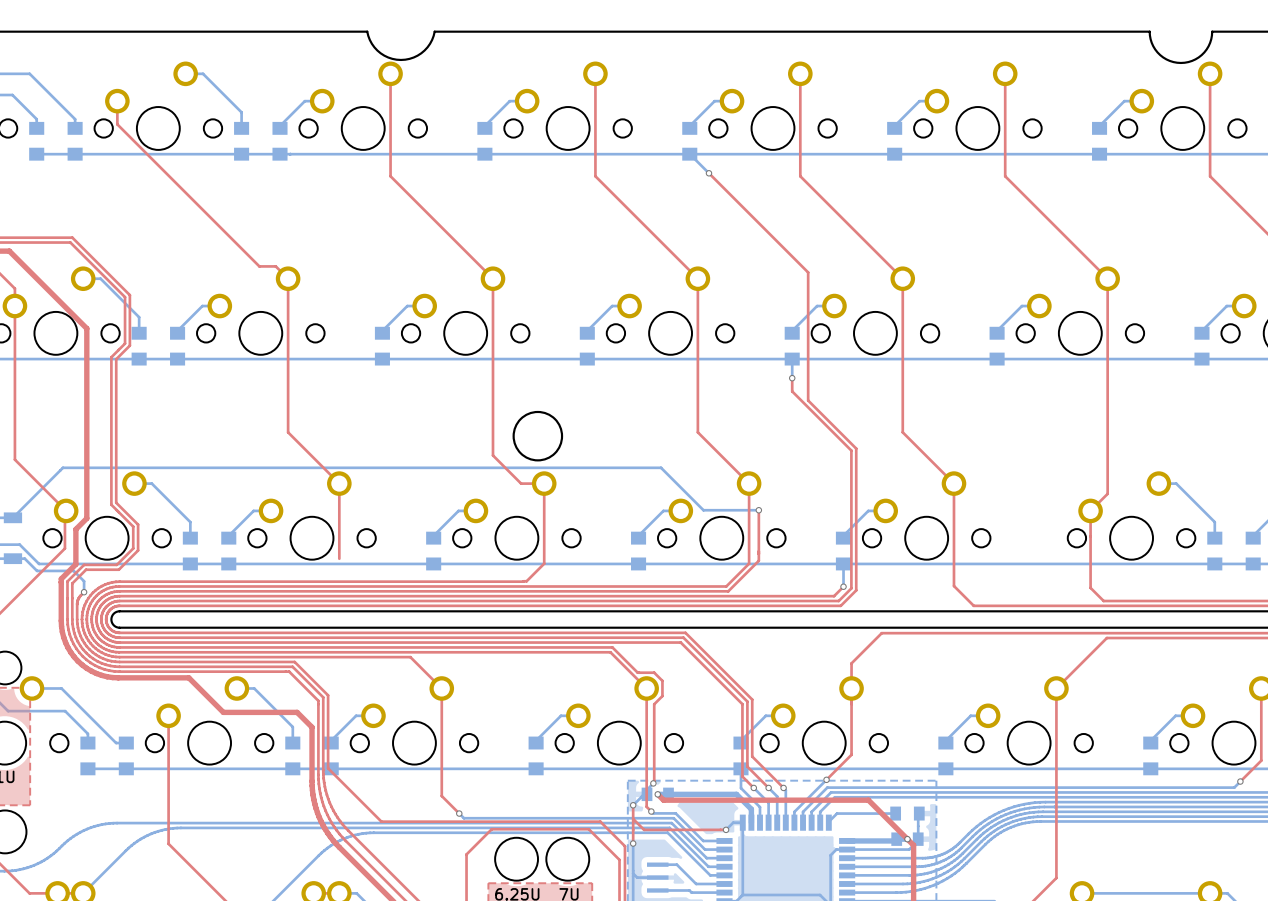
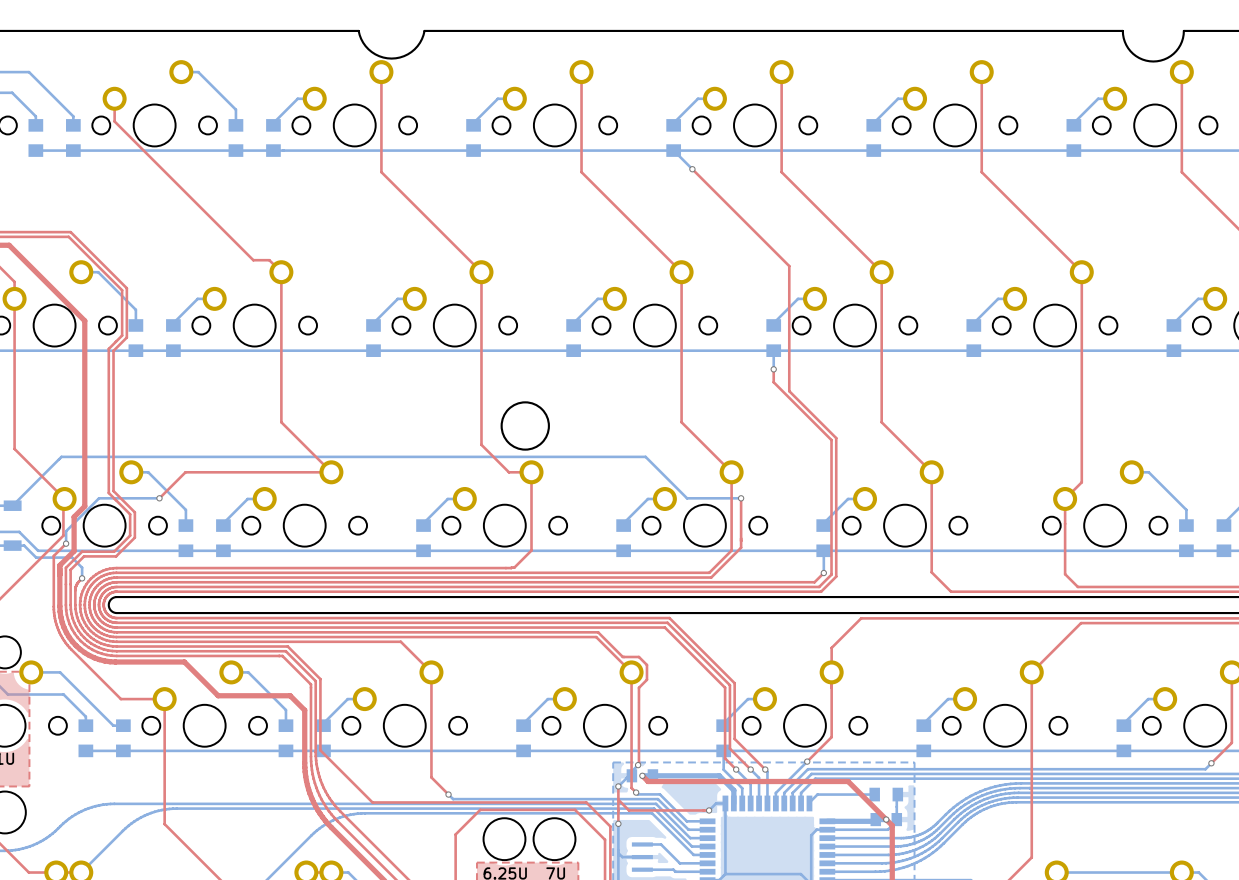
top track: (339, 483) (339, 558) -> (331, 472) (185, 472) (159, 498)
bottom track: none -> (159, 498) (99, 498) (66, 531) (66, 543)
via: none -> (159, 498)
top track: none -> (66, 543) (53, 555) (54, 612) (57, 627) (64, 640) (120, 699) (164, 699)
via: none -> (66, 543)

